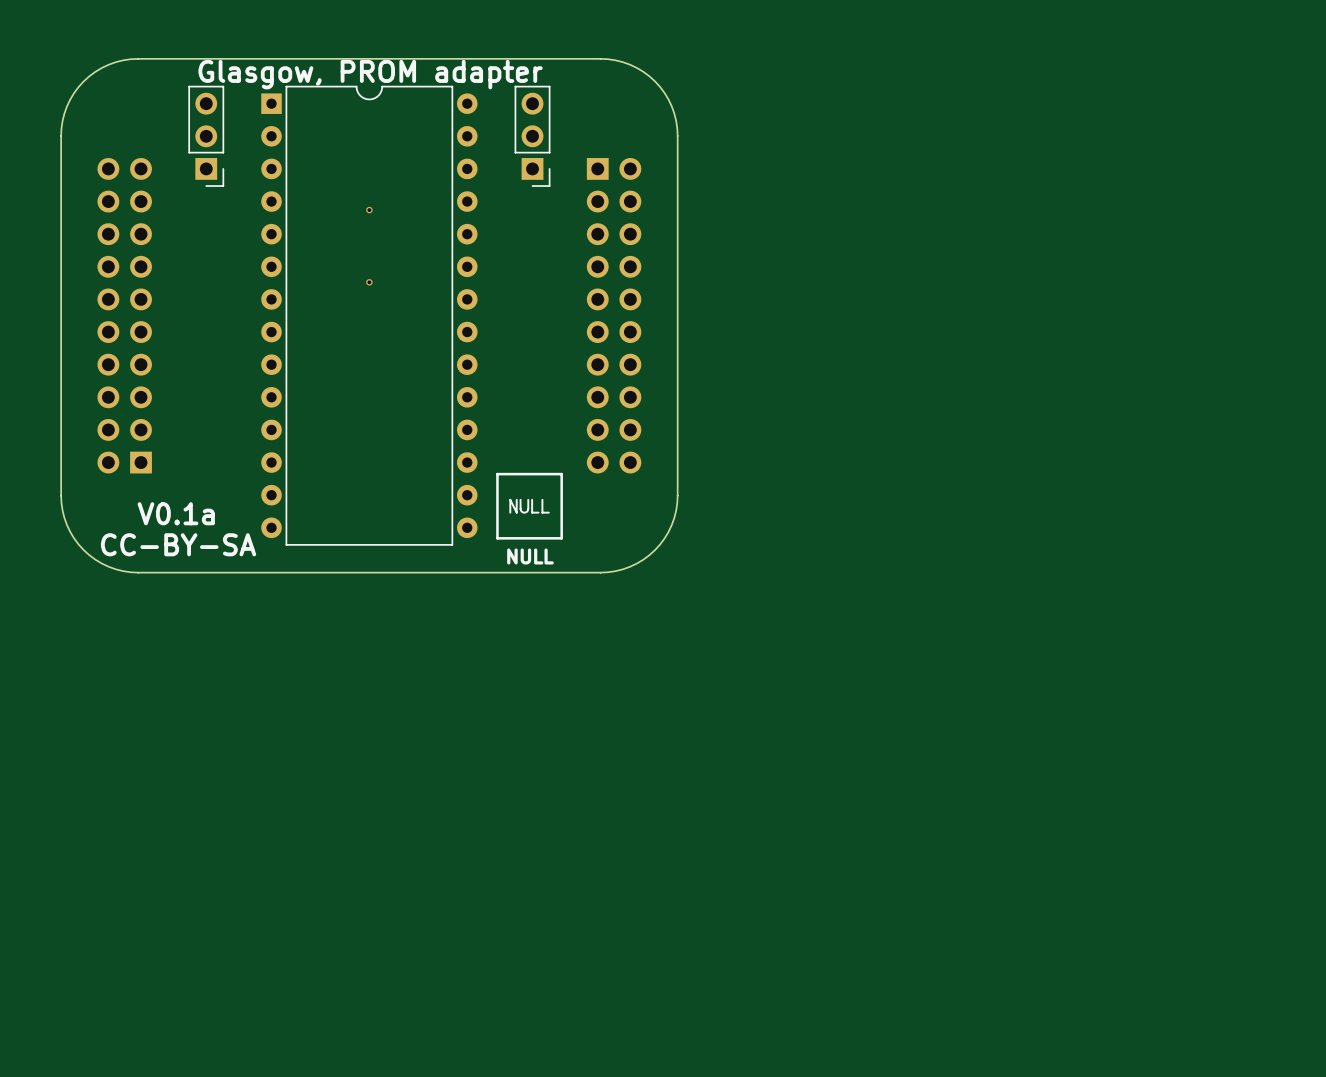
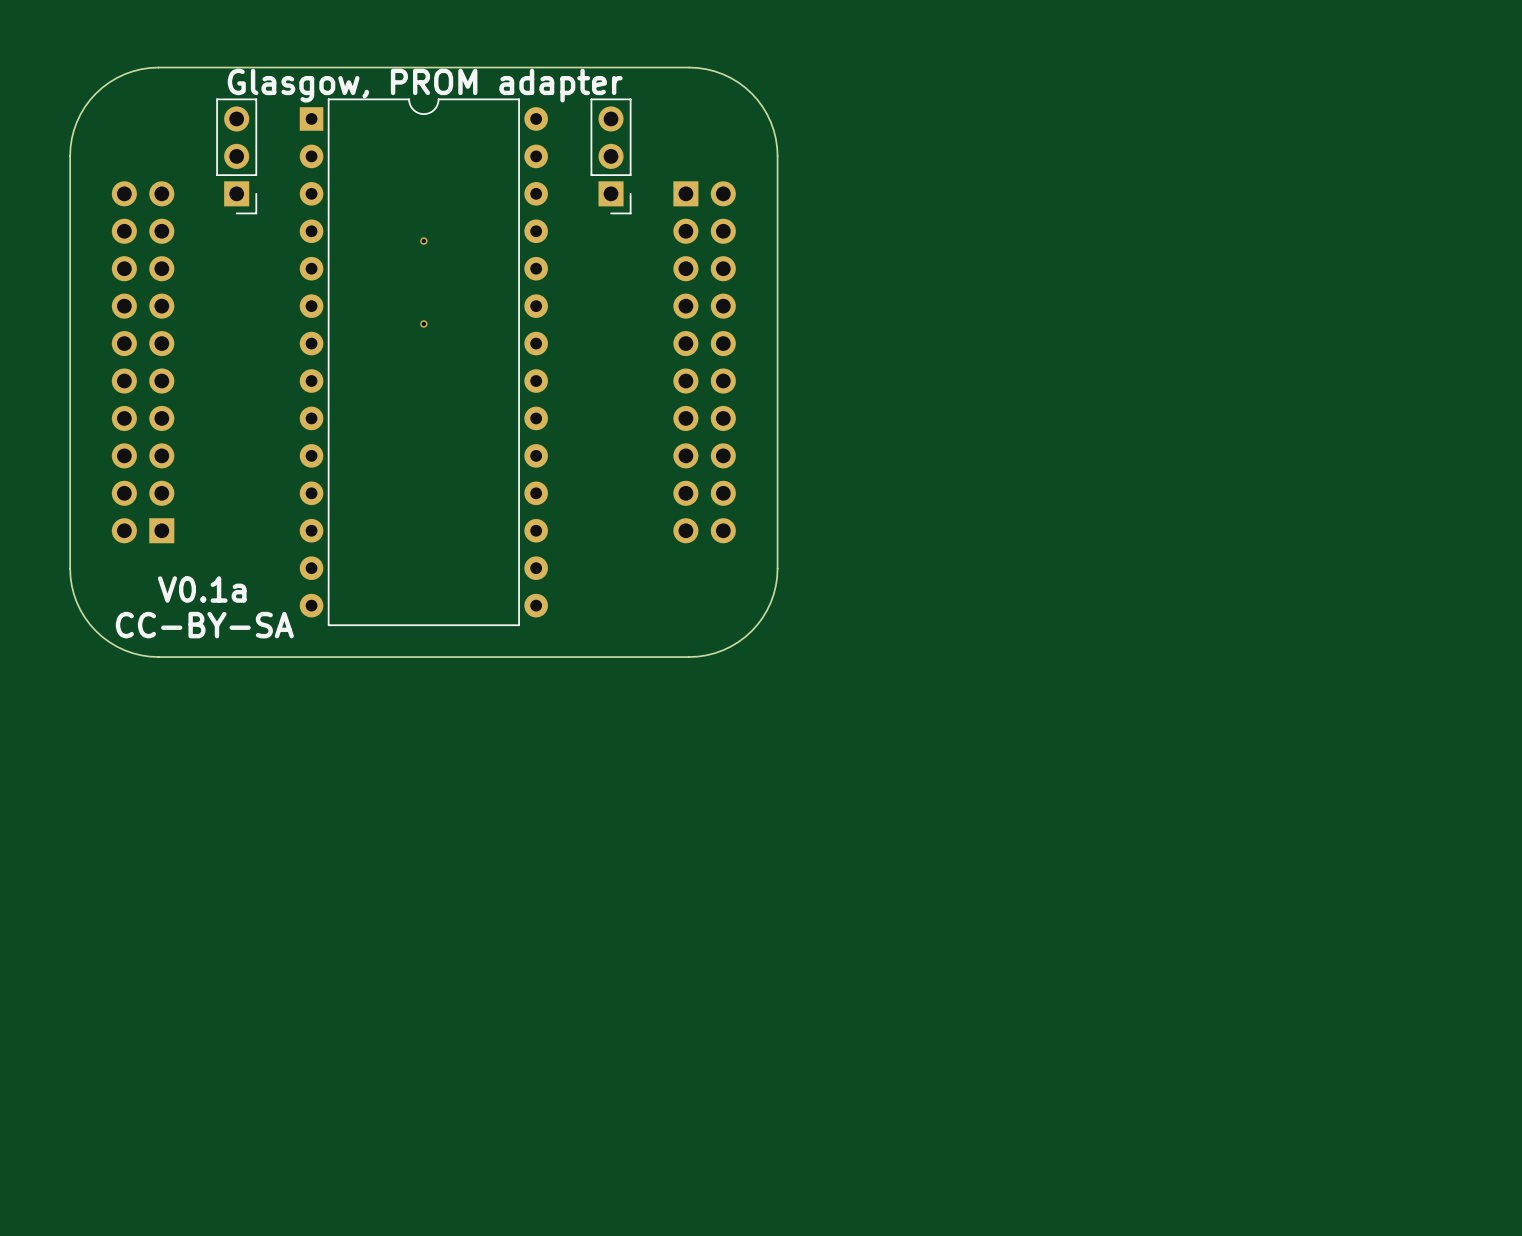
drawing: [496, 472, 563, 540] -> none
text: NULL (530, 556) -> none

